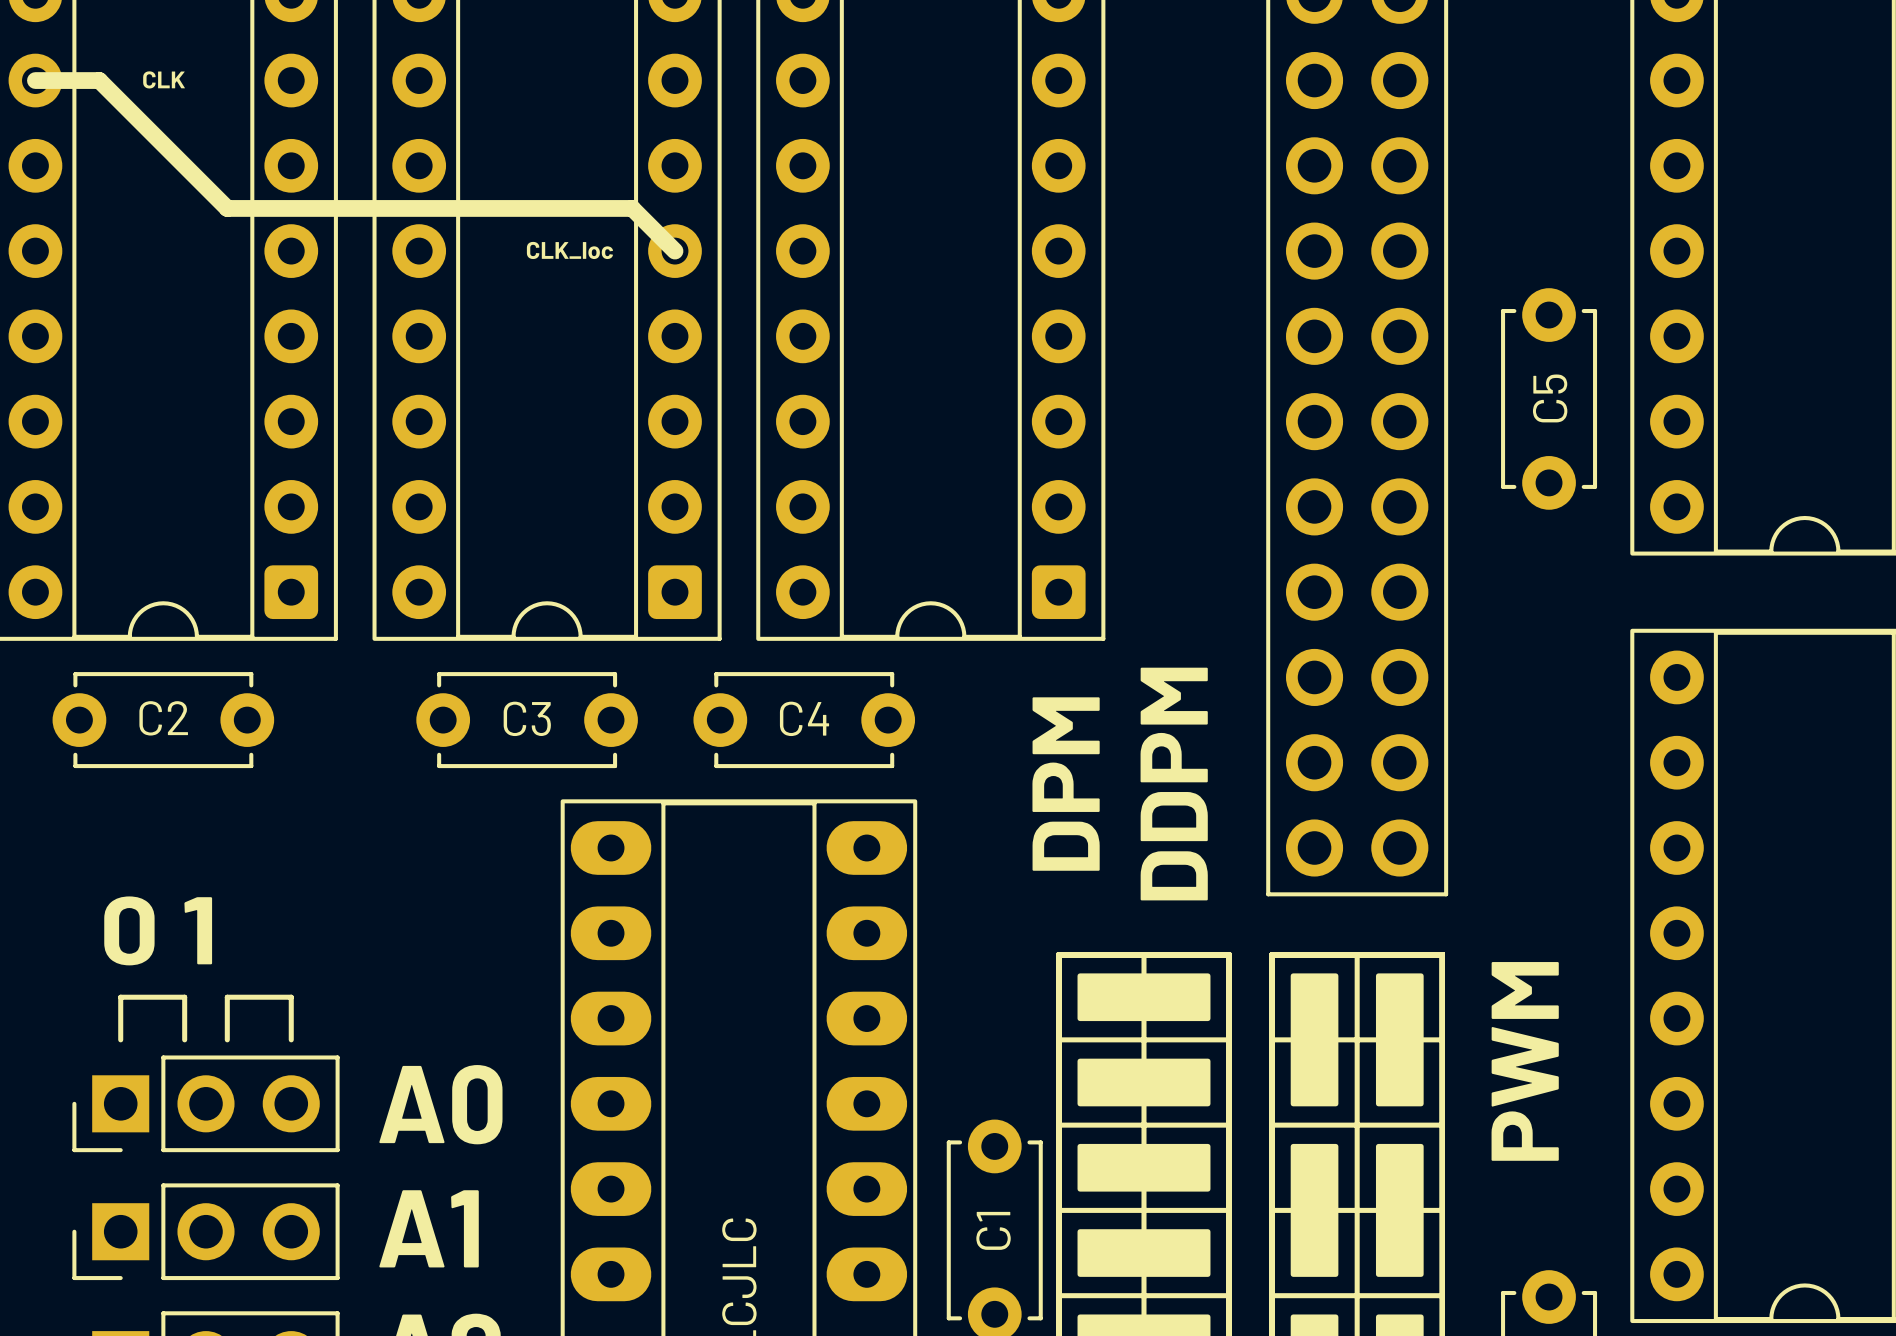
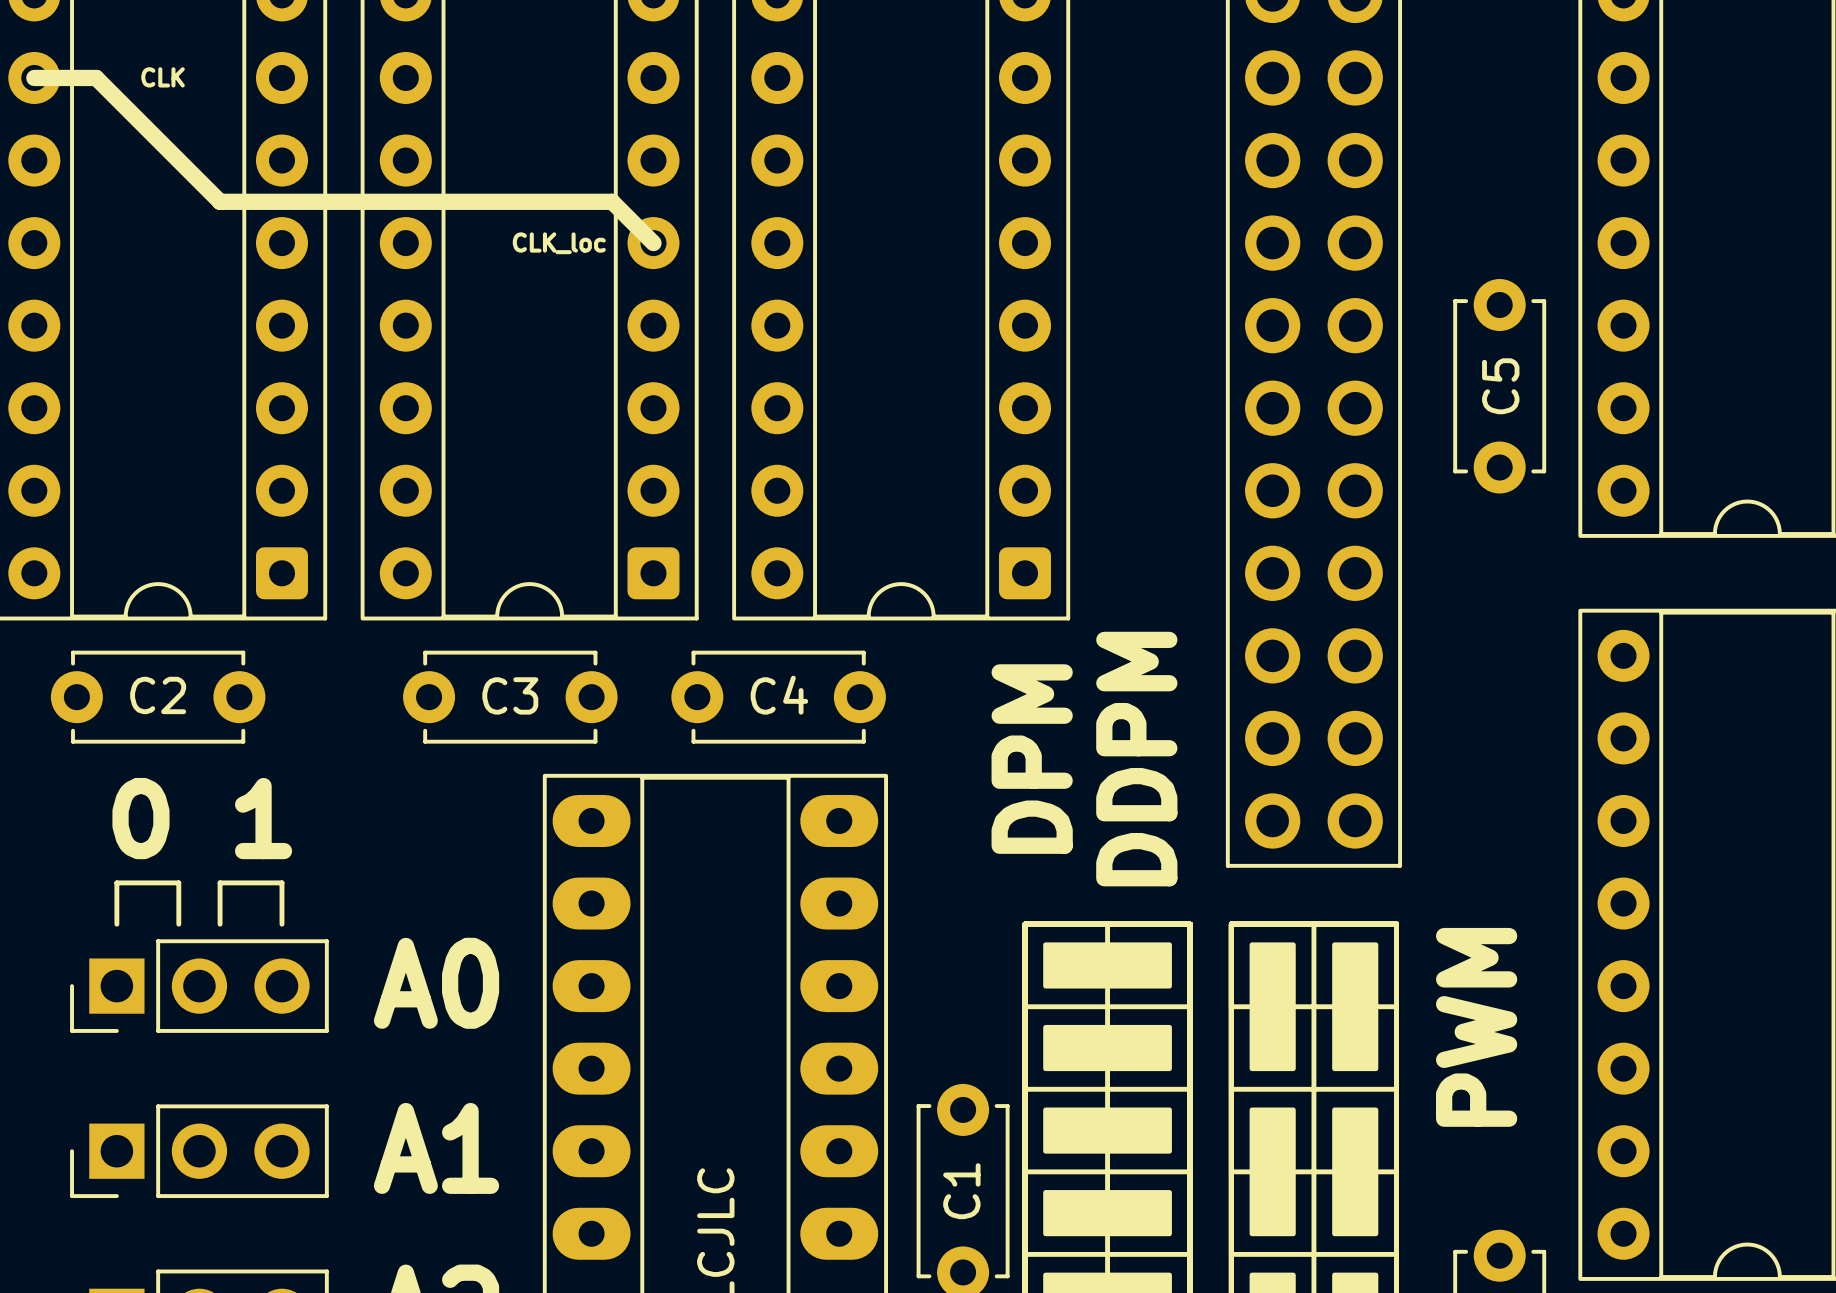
text position: 0 1 (158, 930) -> 0 1 (202, 818)
part: none -> (199, 986)
line: (120, 1039) (120, 997) (184, 997) (184, 1039) -> (116, 924) (116, 882) (178, 882) (178, 924)
line: (227, 1039) (227, 997) (291, 997) (291, 1039) -> (220, 924) (220, 882) (281, 882) (281, 924)
part: (205, 1103) -> none
text position: A0 (440, 1104) -> A0 (436, 983)
part: none -> (199, 1151)
text position: A1 (429, 1228) -> A1 (436, 1148)
part: (205, 1231) -> none

